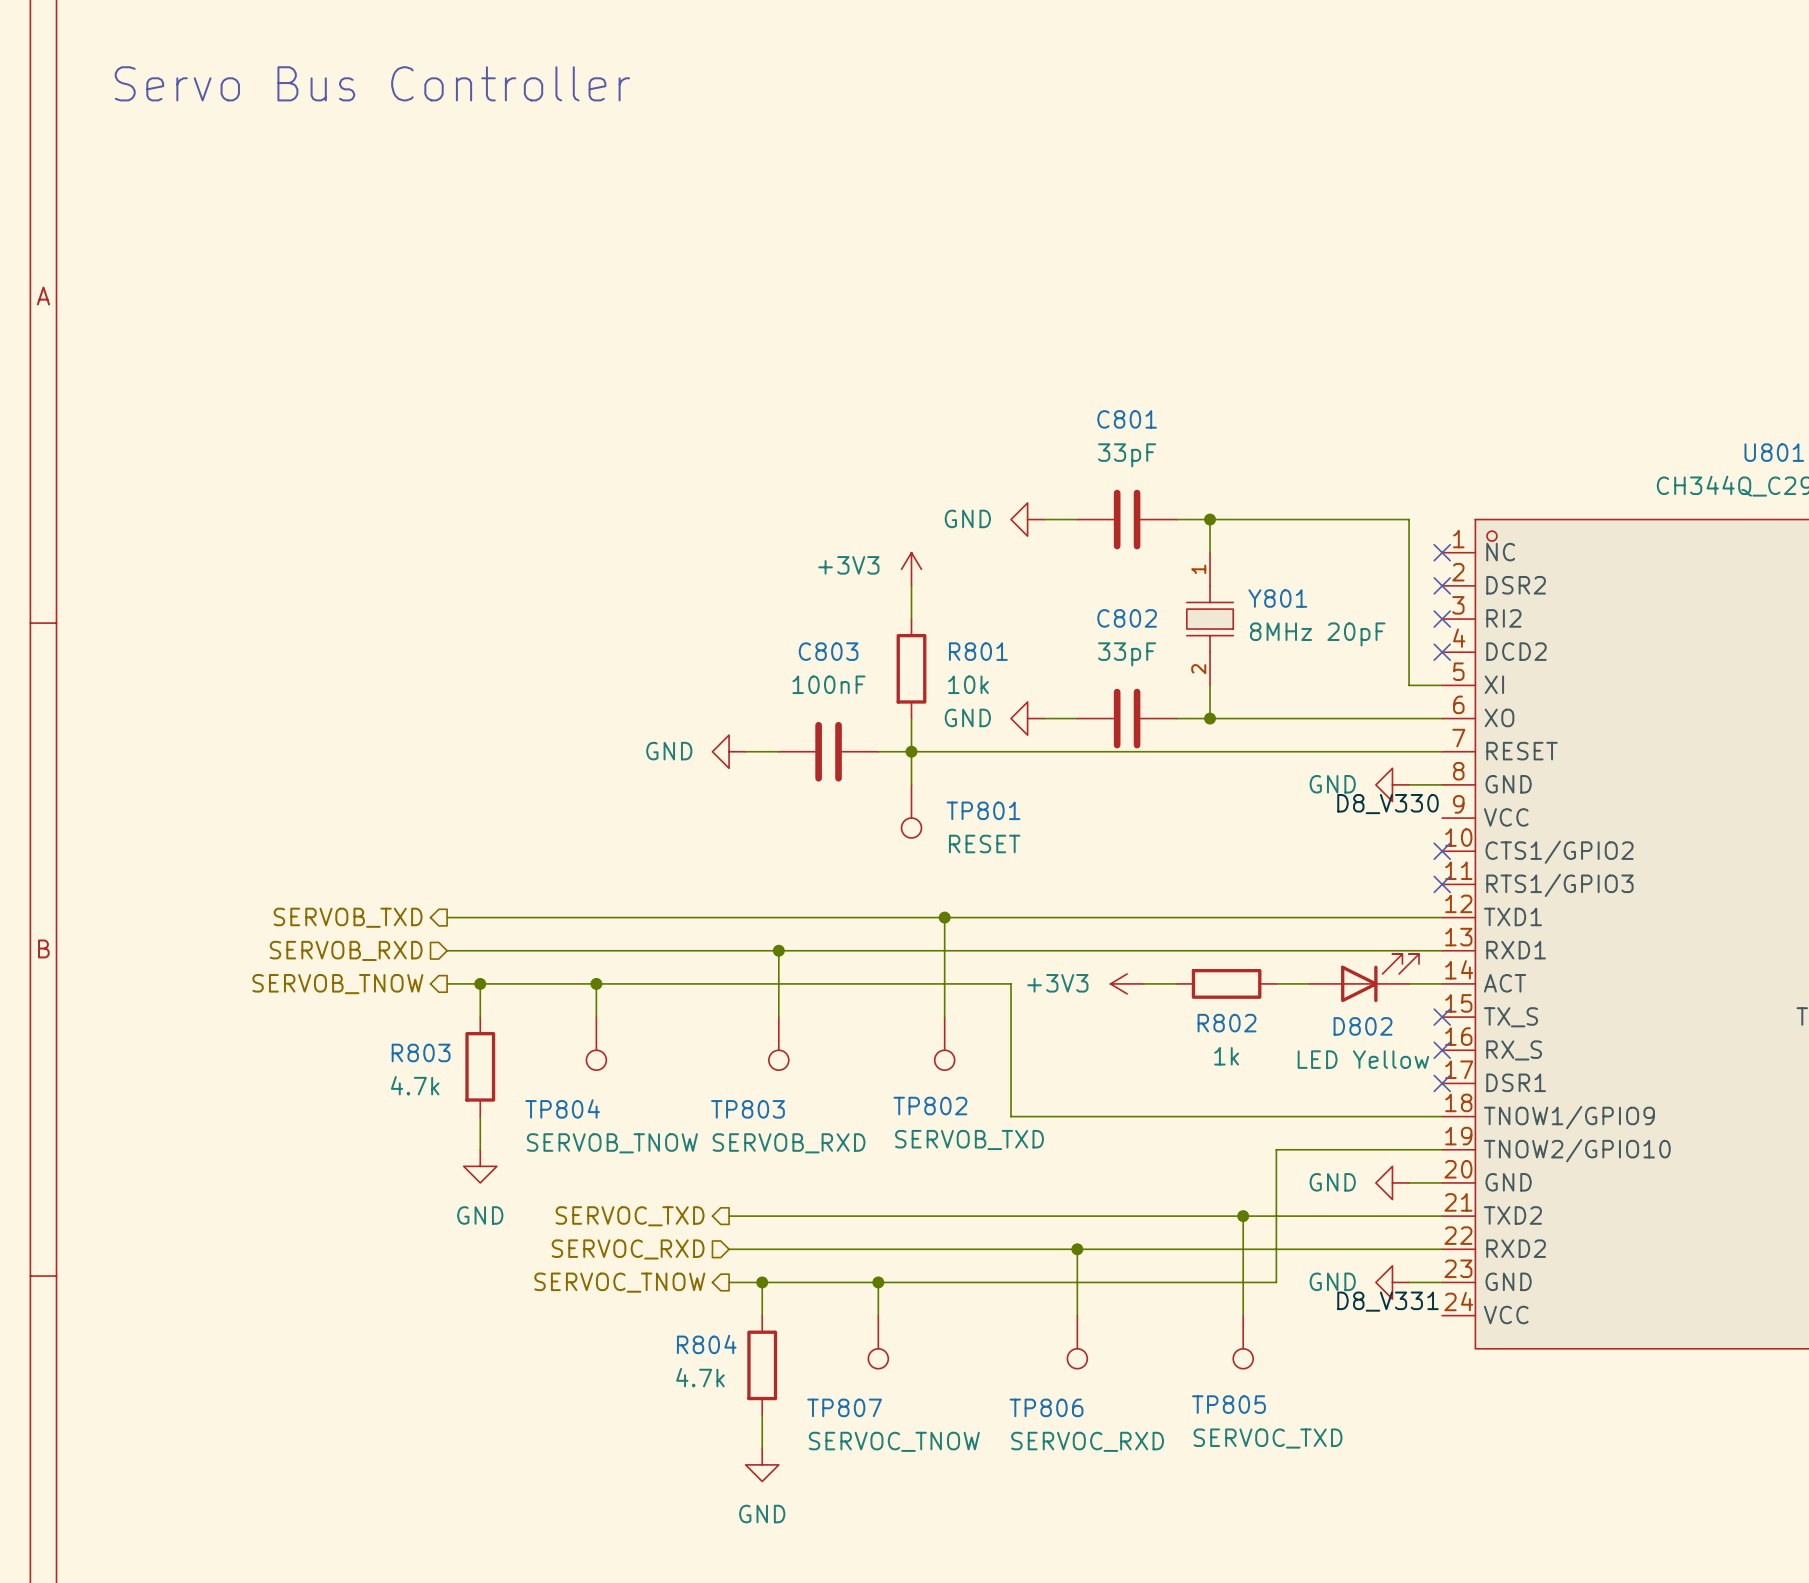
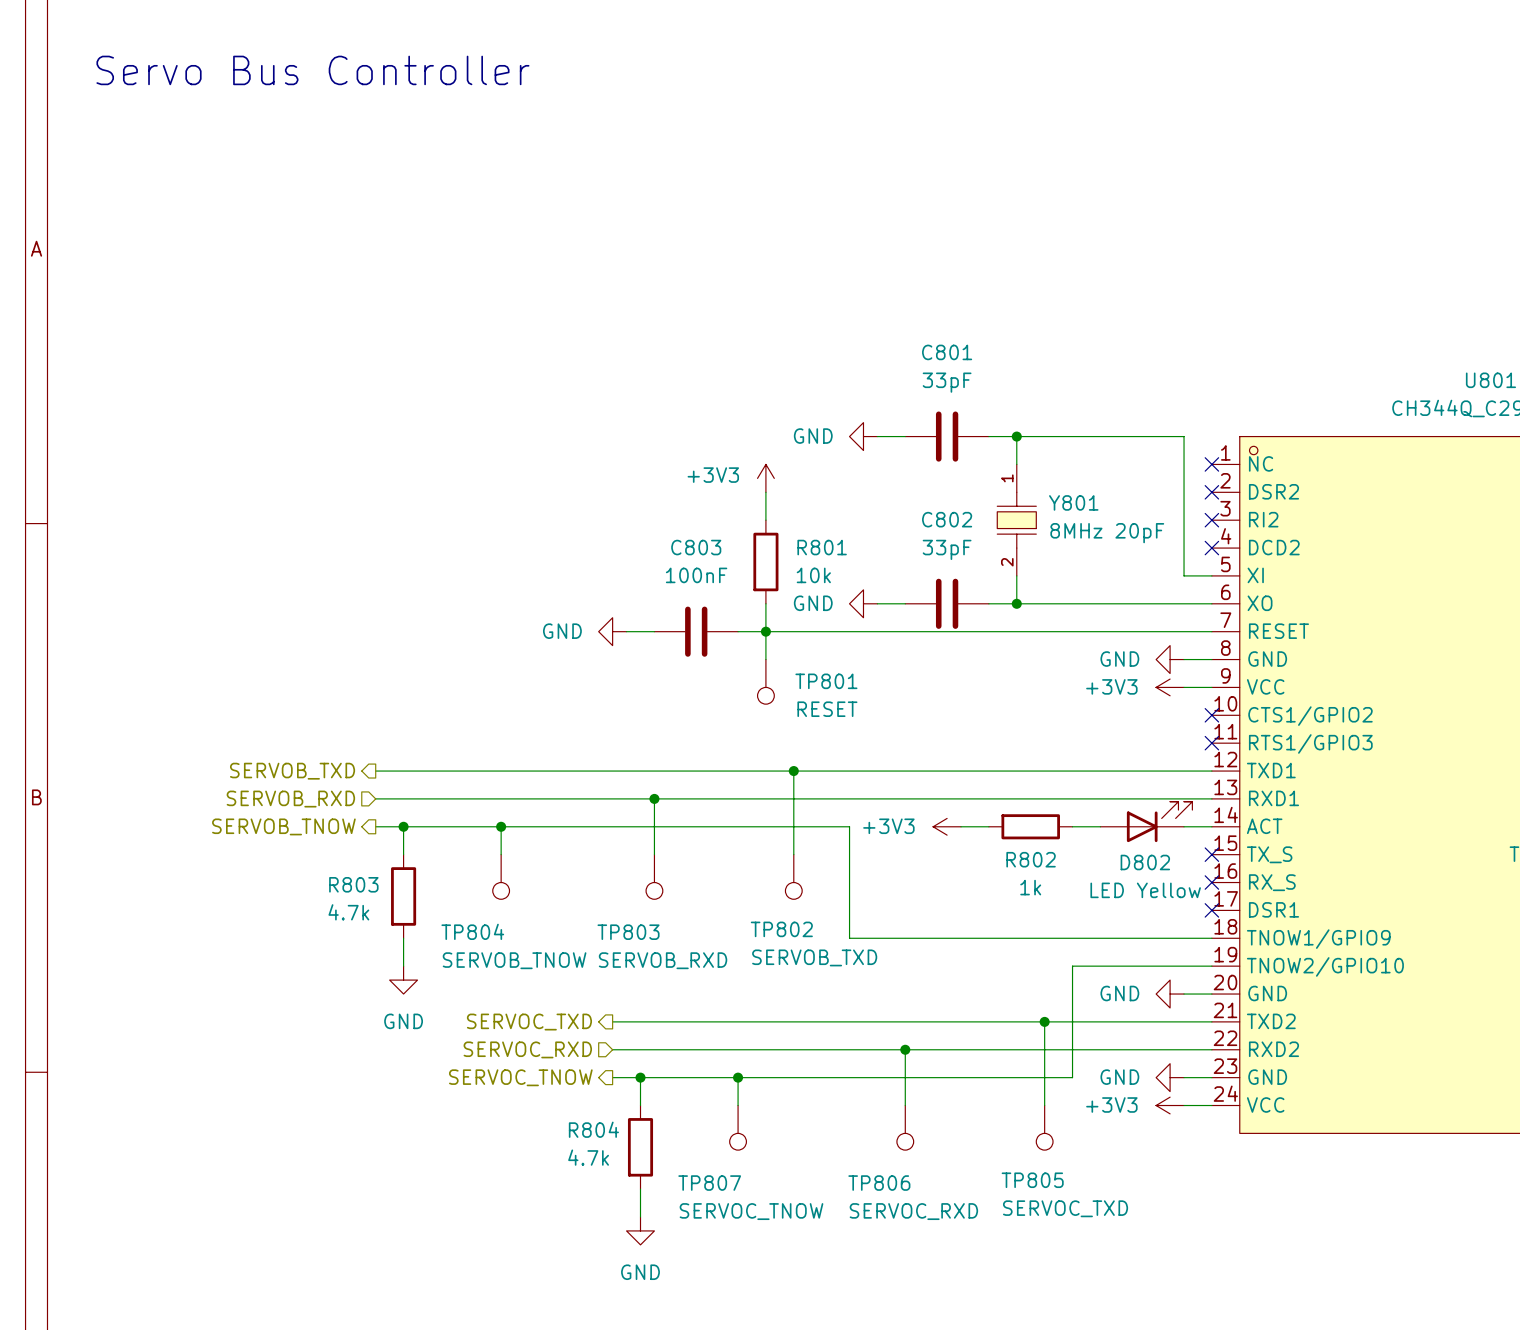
label: D8_V330 (1387, 804) -> none
power symbol: none -> +3V3 (1170, 687)
wire: none -> (1184, 687) (1211, 687)
label: D8_V331 (1387, 1301) -> none
power symbol: none -> +3V3 (1170, 1105)
wire: none -> (1184, 1105) (1211, 1105)

